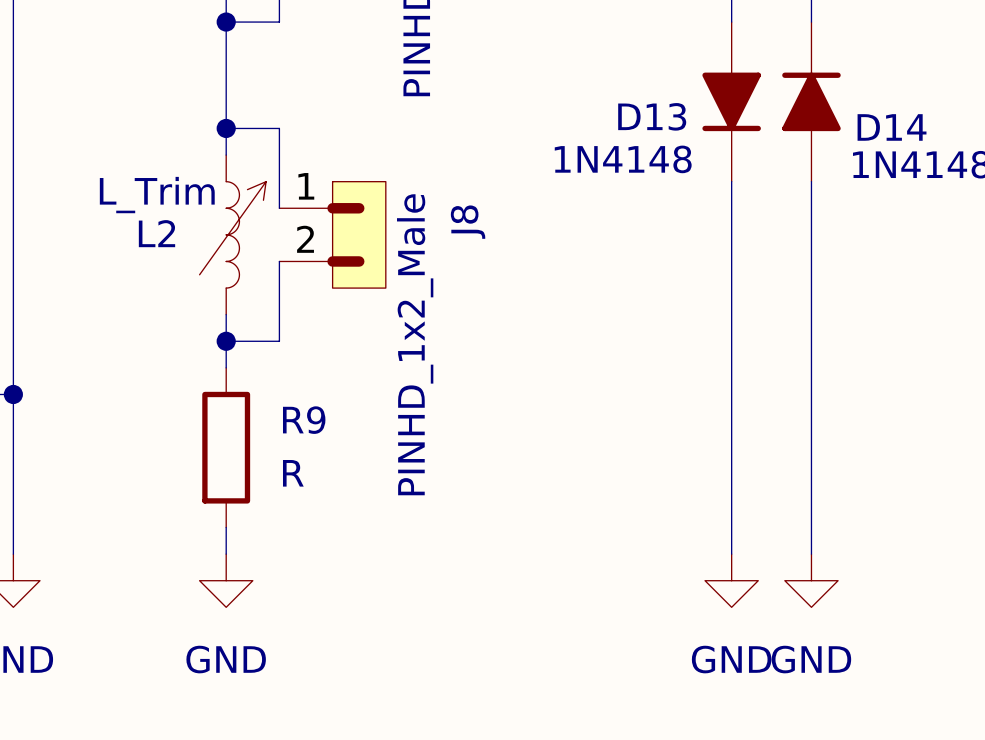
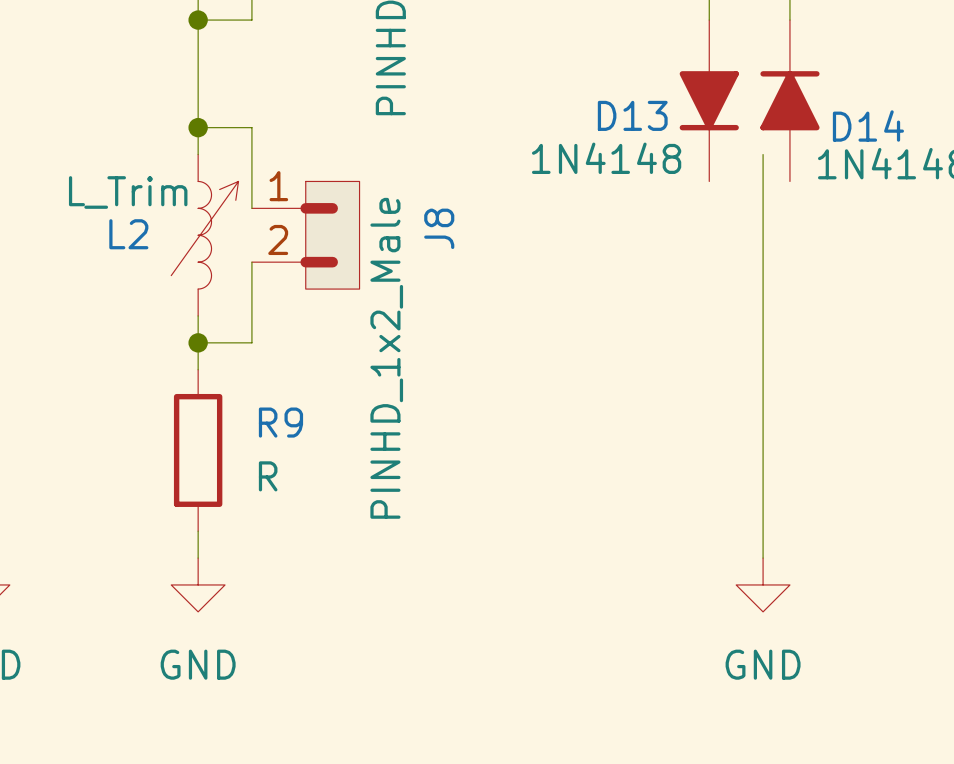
wire: none -> (763, 154) (763, 558)
wire: (731, 181) (731, 554) -> none
wire: (811, 181) (811, 554) -> none
power symbol: GND (731, 580) -> none
power symbol: none -> GND (763, 584)
power symbol: GND (811, 580) -> none

